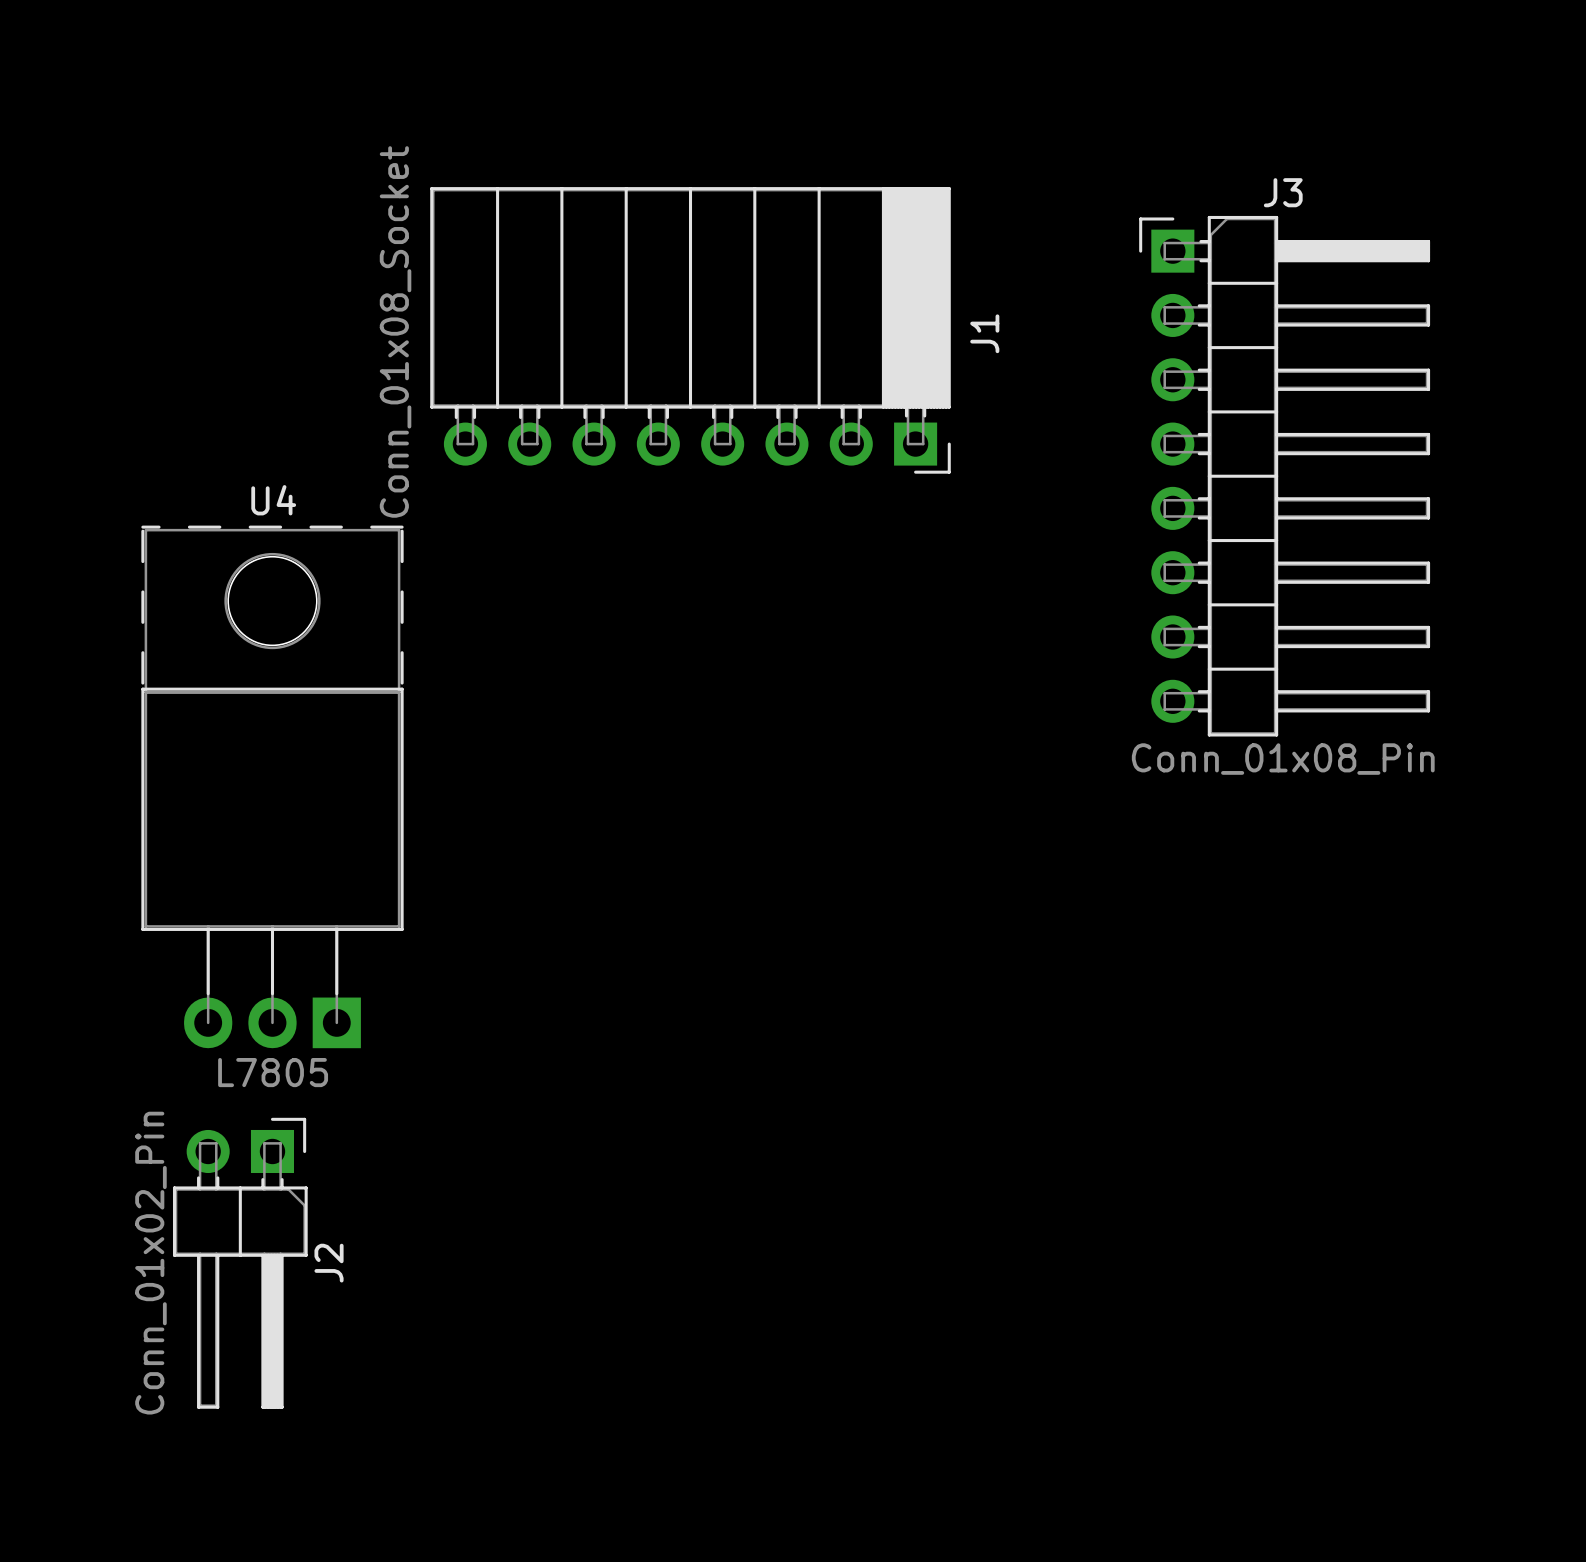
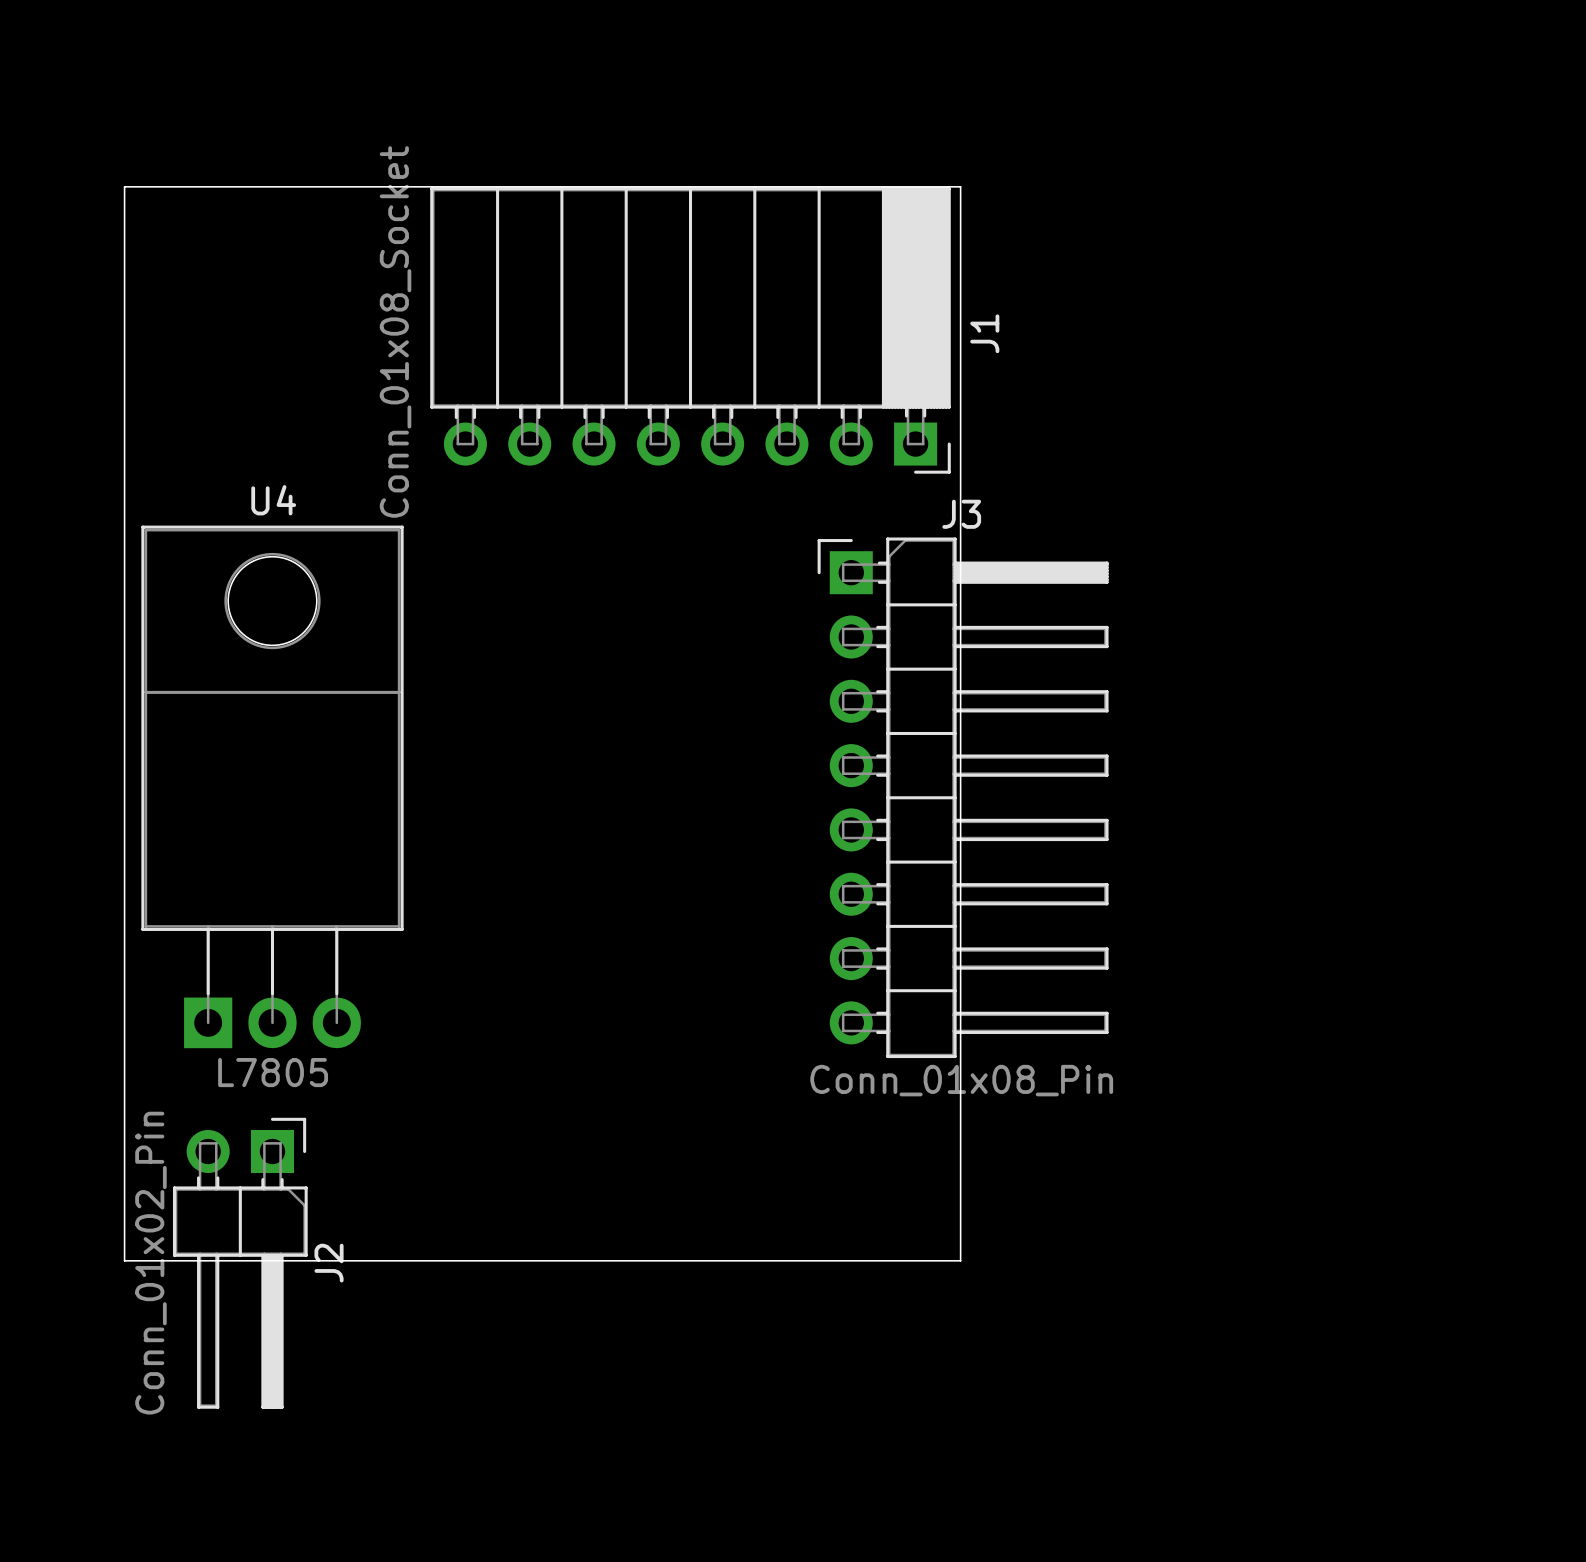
board edge: none -> (124, 186) (960, 186) (960, 1260) (124, 1260) (124, 186)
J3 position: (1284, 476) -> (963, 797)
U4 footprint: [141, 525, 404, 1049] -> [141, 525, 404, 1049]

